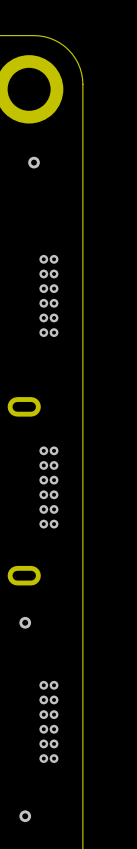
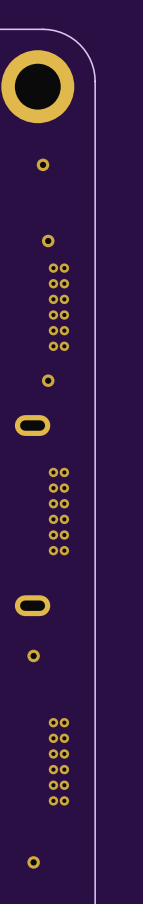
via: none -> (48, 240)
via: none -> (48, 380)

